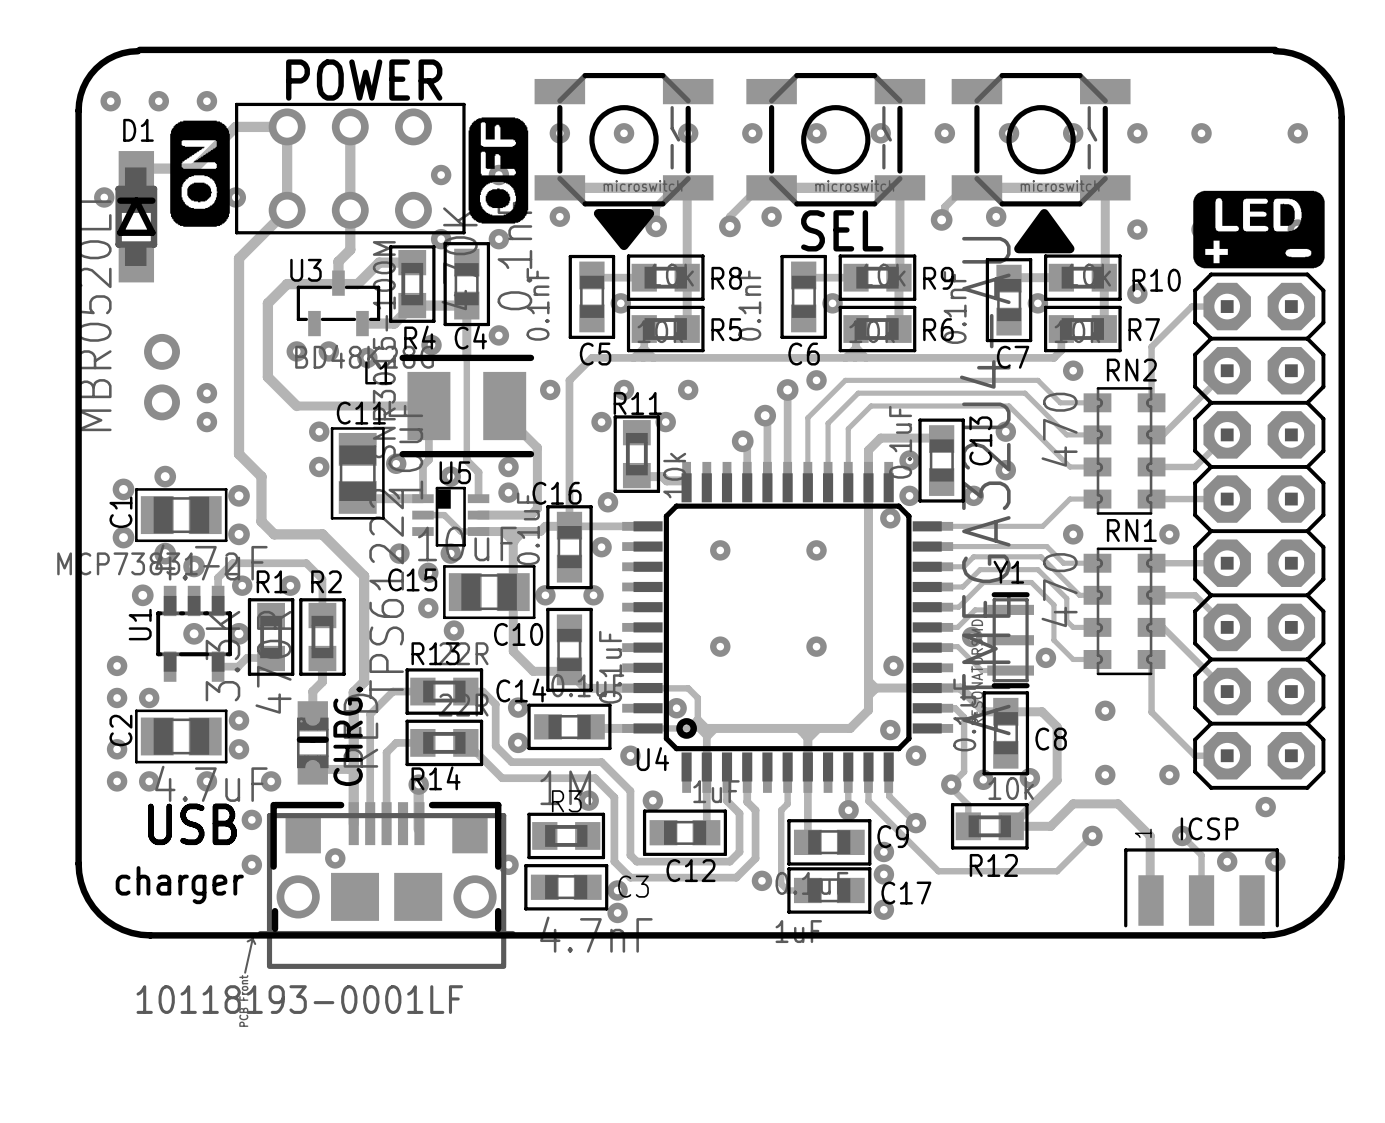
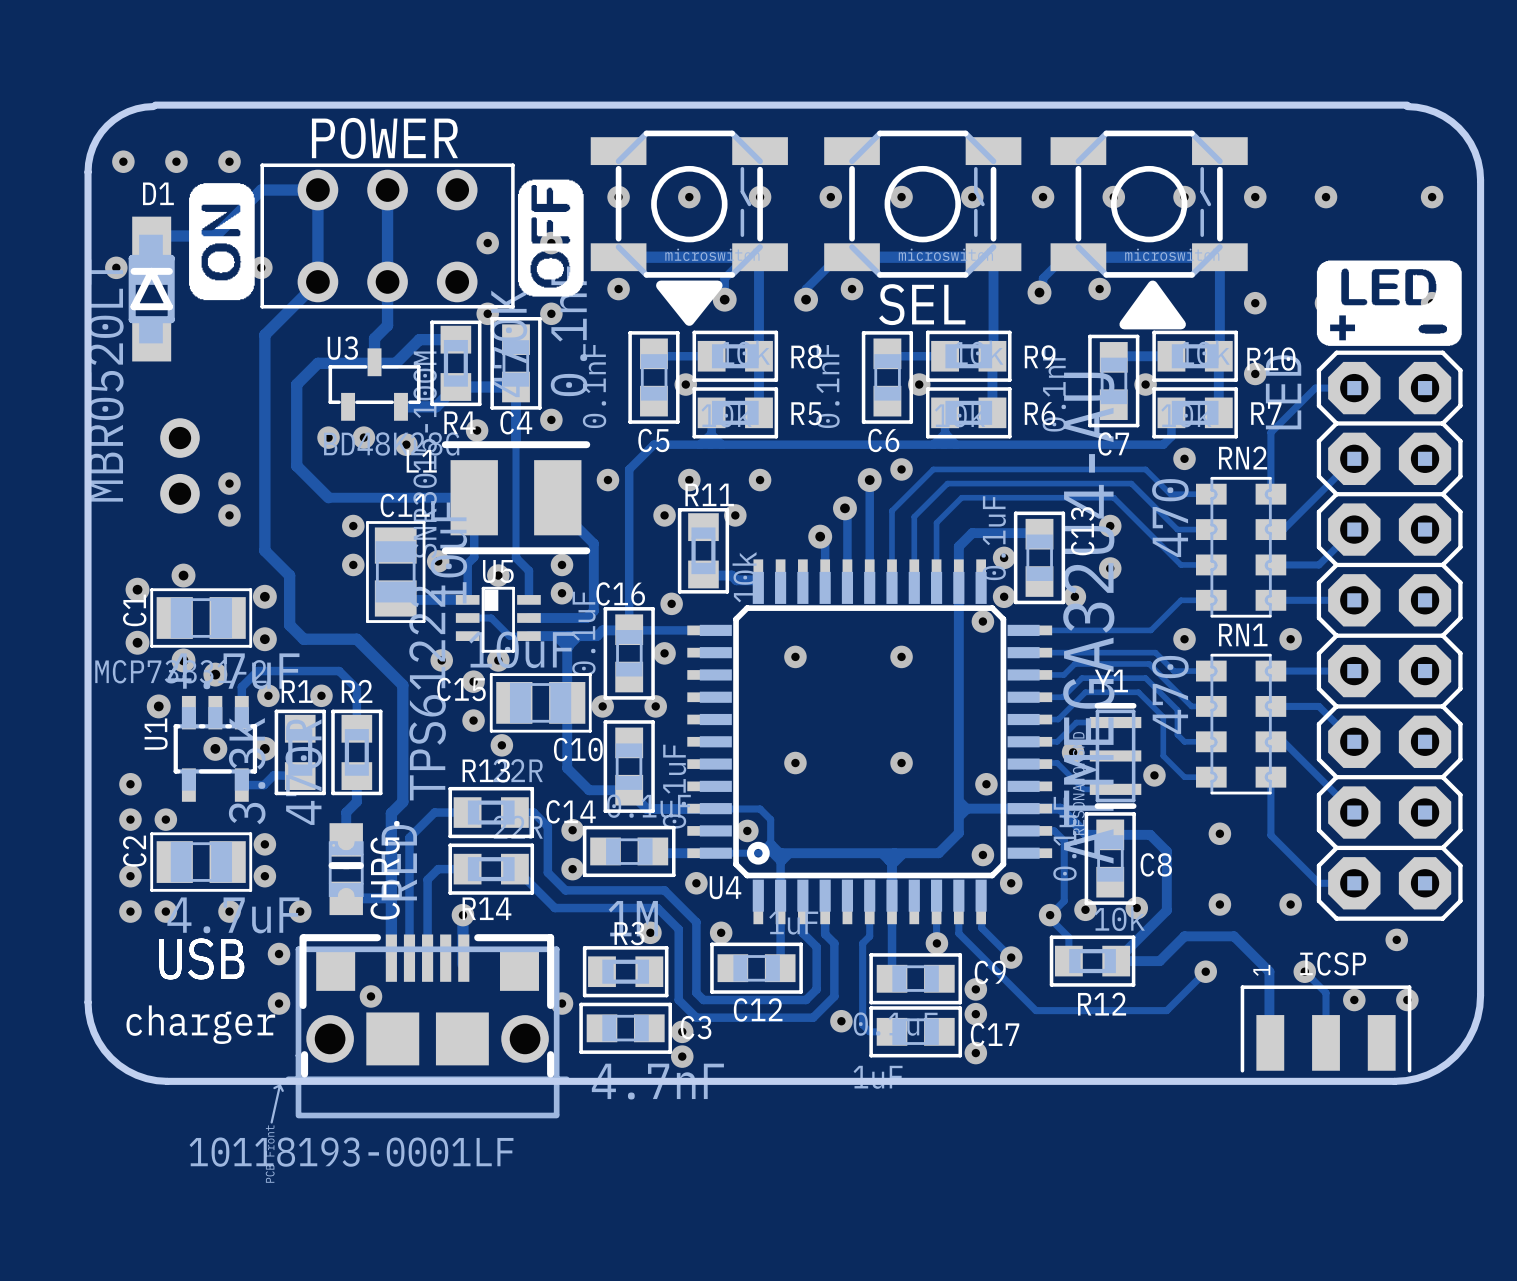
part value: none -> LED (1283, 392)

